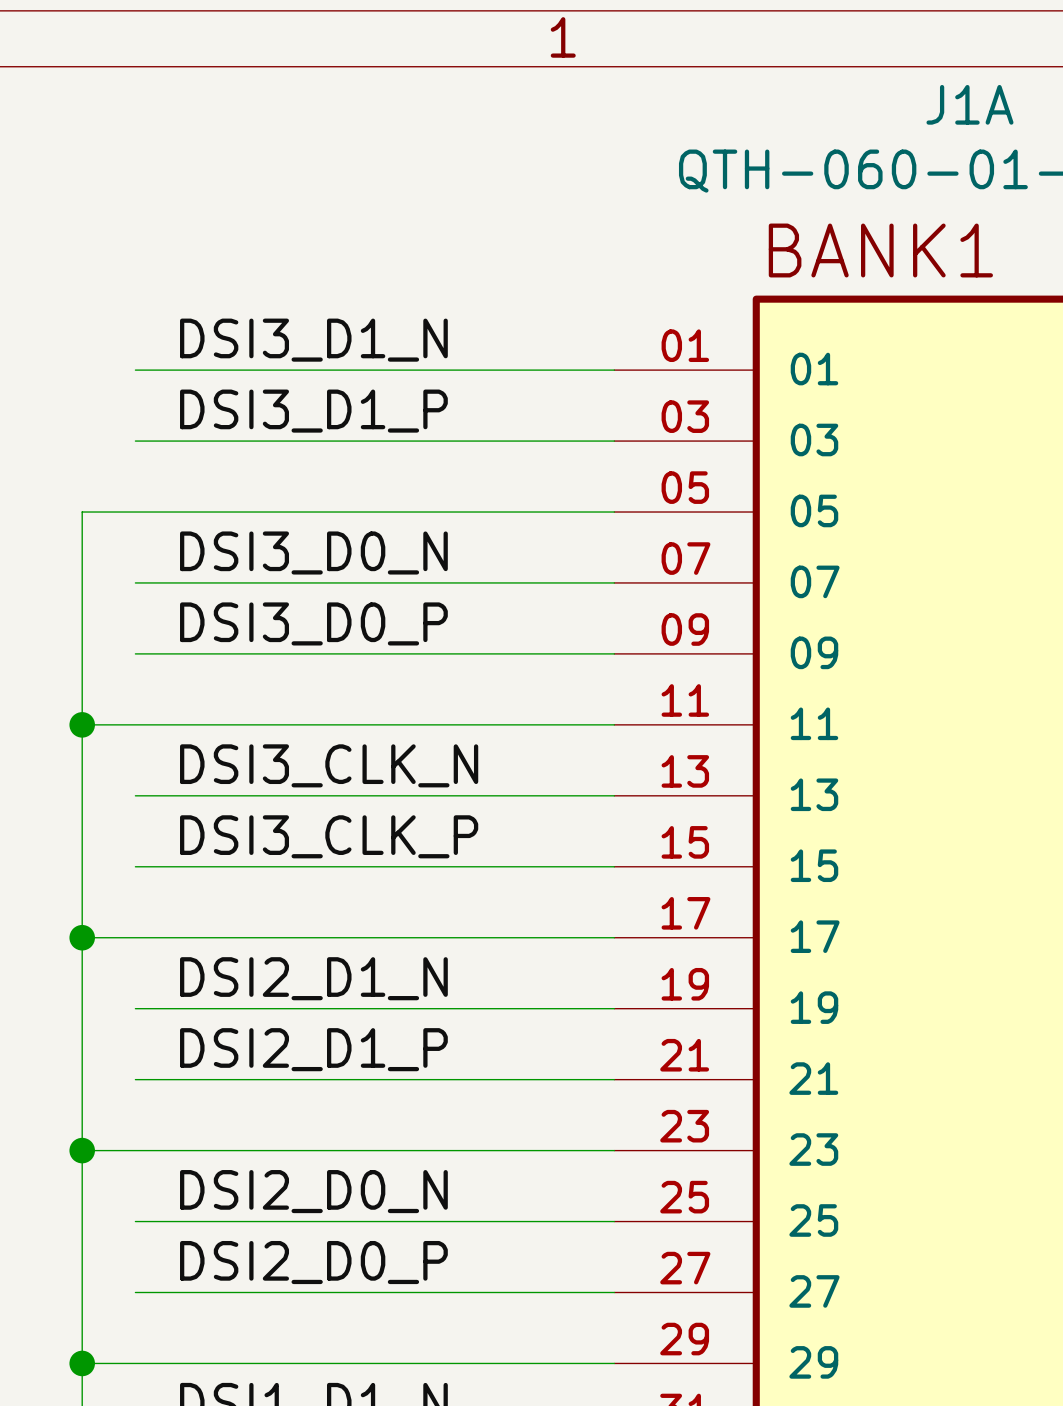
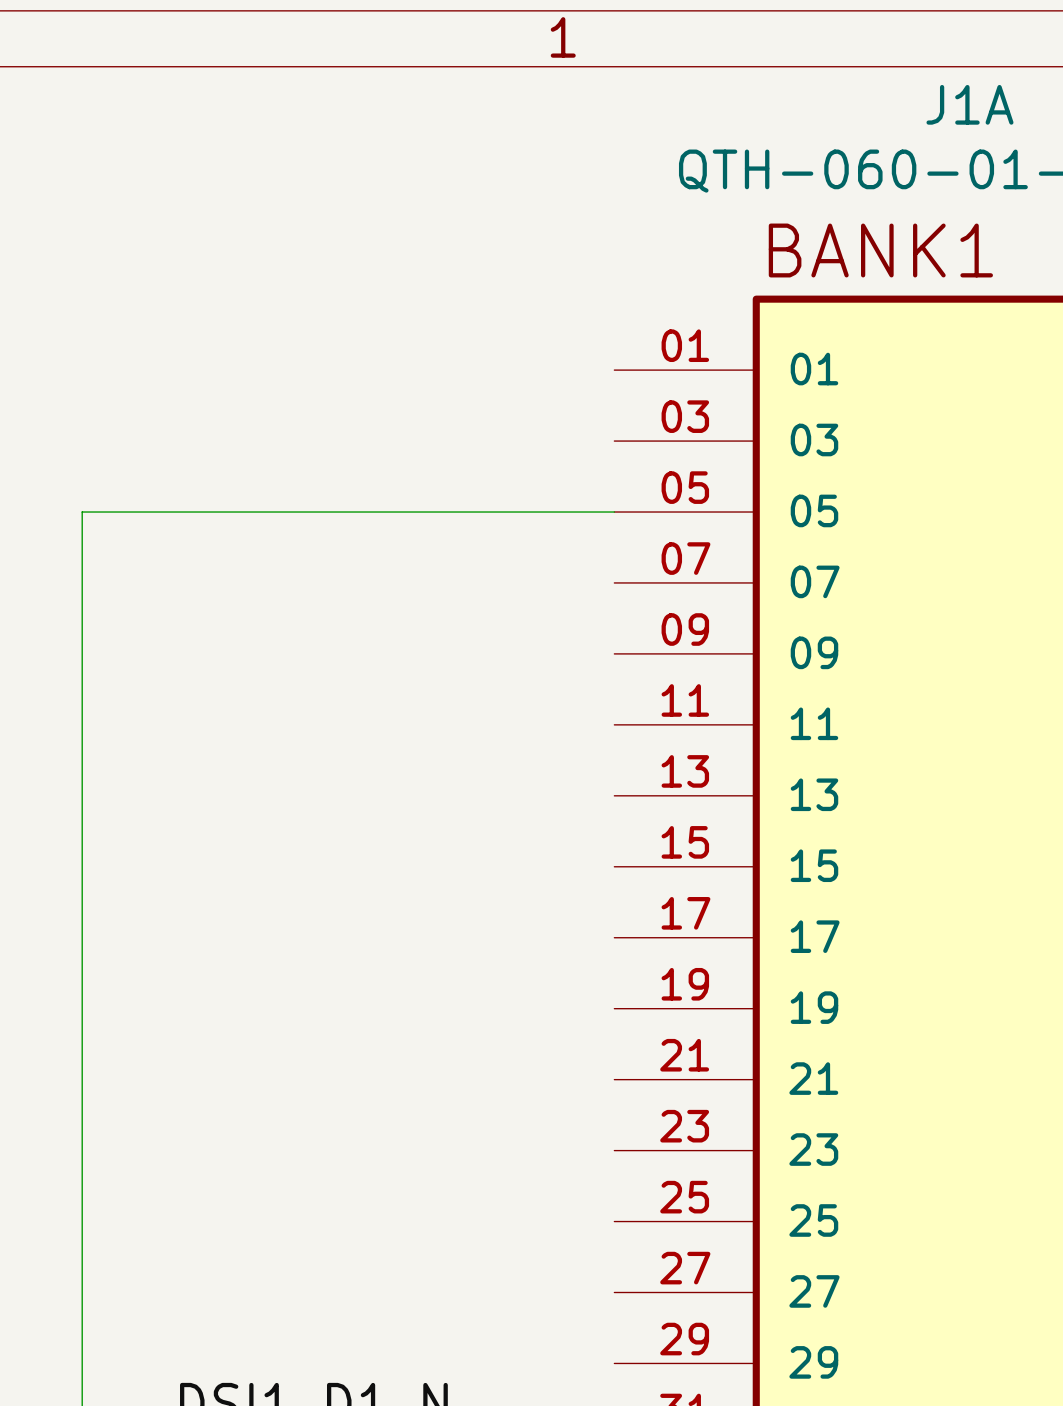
label: DSI3_D1_N (313, 340) -> none
wire: (135, 370) (614, 370) -> none
label: DSI3_D1_P (313, 411) -> none
wire: (135, 441) (614, 441) -> none
label: DSI3_D0_N (313, 552) -> none
wire: (135, 582) (614, 582) -> none
label: DSI3_D0_P (313, 623) -> none
wire: (135, 653) (614, 653) -> none
wire: (82, 724) (614, 724) -> none
junction: (82, 724) -> none
label: DSI3_CLK_N (329, 765) -> none
wire: (135, 795) (614, 795) -> none
label: DSI3_CLK_P (329, 836) -> none
wire: (135, 866) (614, 866) -> none
wire: (82, 937) (614, 937) -> none
junction: (82, 937) -> none
label: DSI2_D1_N (313, 978) -> none
wire: (135, 1008) (614, 1008) -> none
label: DSI2_D1_P (313, 1049) -> none
wire: (135, 1079) (614, 1079) -> none
wire: (82, 1150) (614, 1150) -> none
junction: (82, 1150) -> none
label: DSI2_D0_N (313, 1191) -> none
wire: (135, 1221) (614, 1221) -> none
label: DSI2_D0_P (313, 1262) -> none
wire: (135, 1292) (614, 1292) -> none
wire: (82, 1363) (614, 1363) -> none
junction: (82, 1363) -> none

